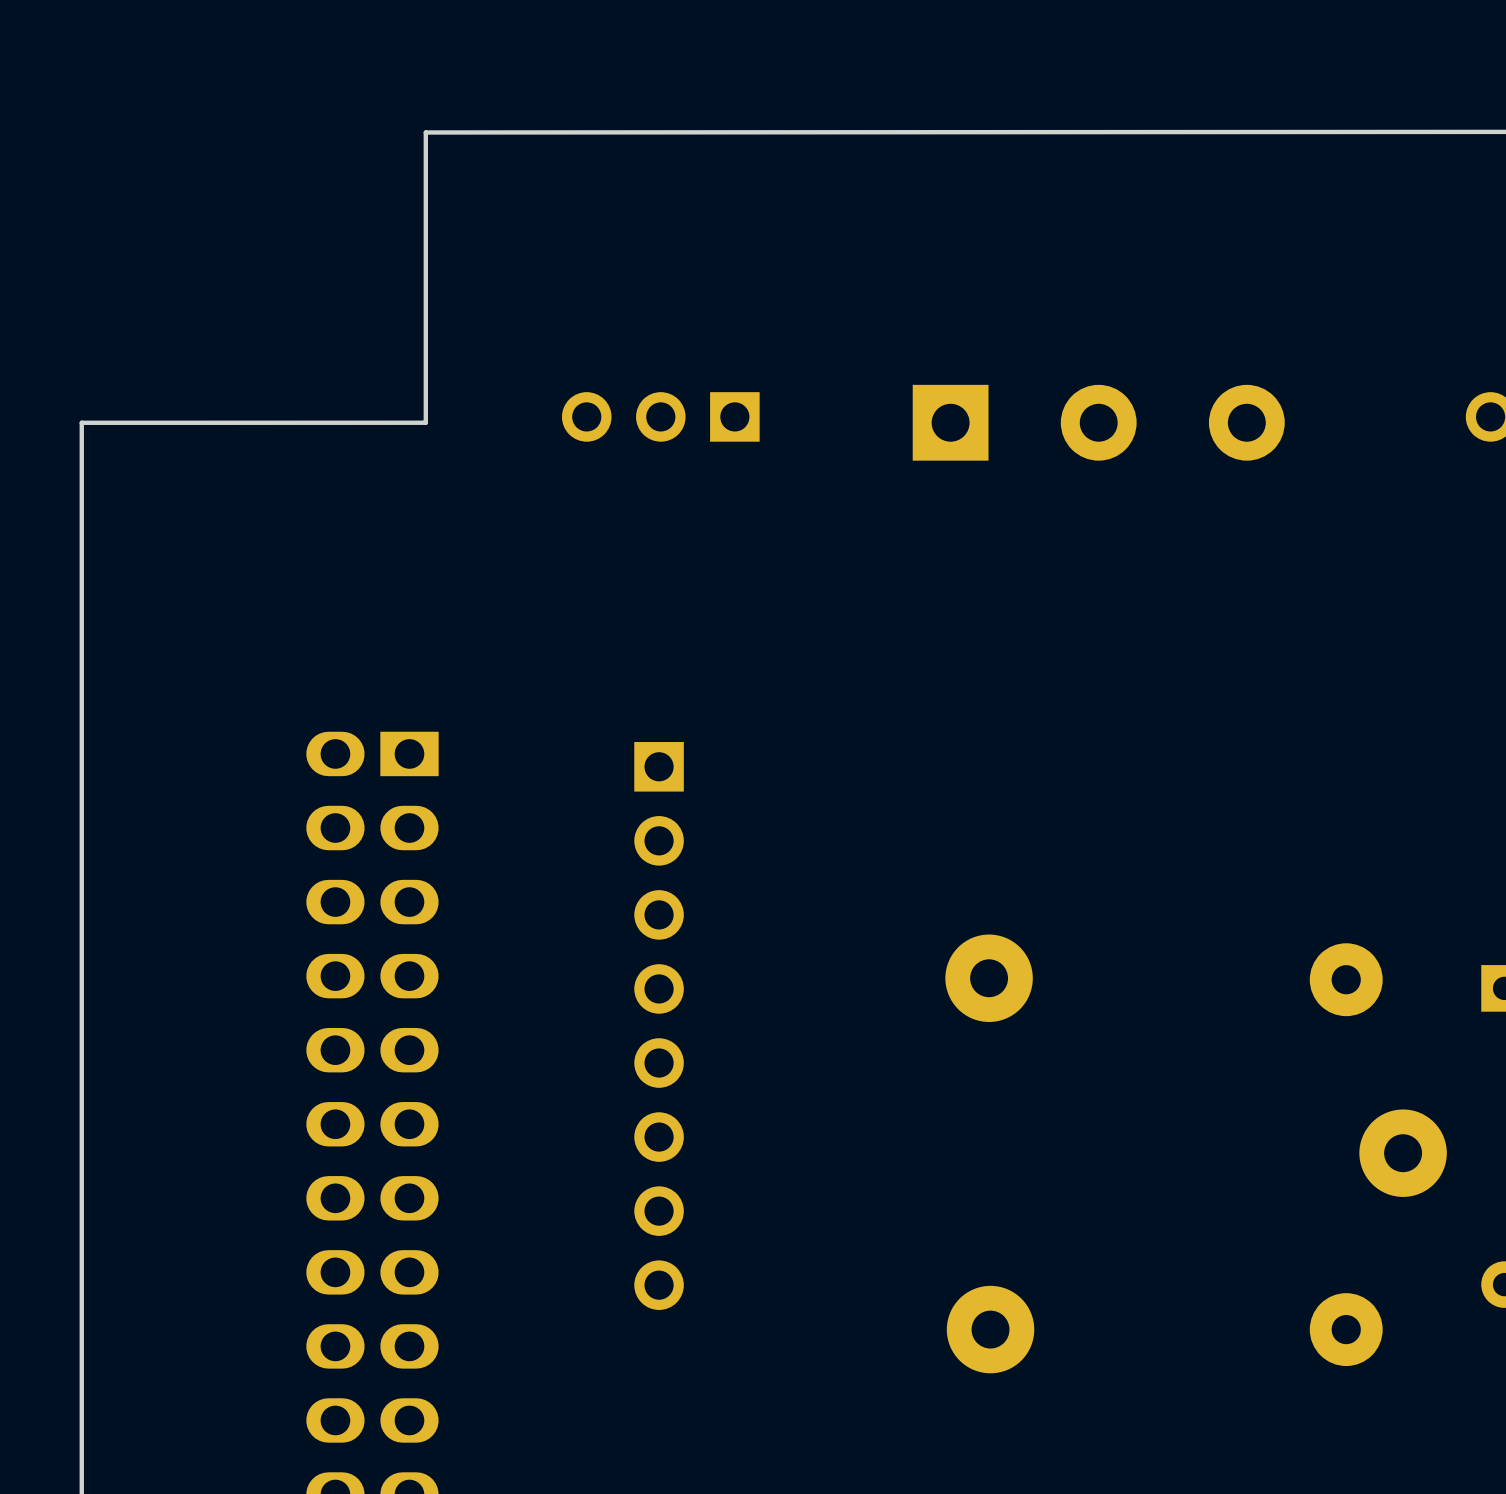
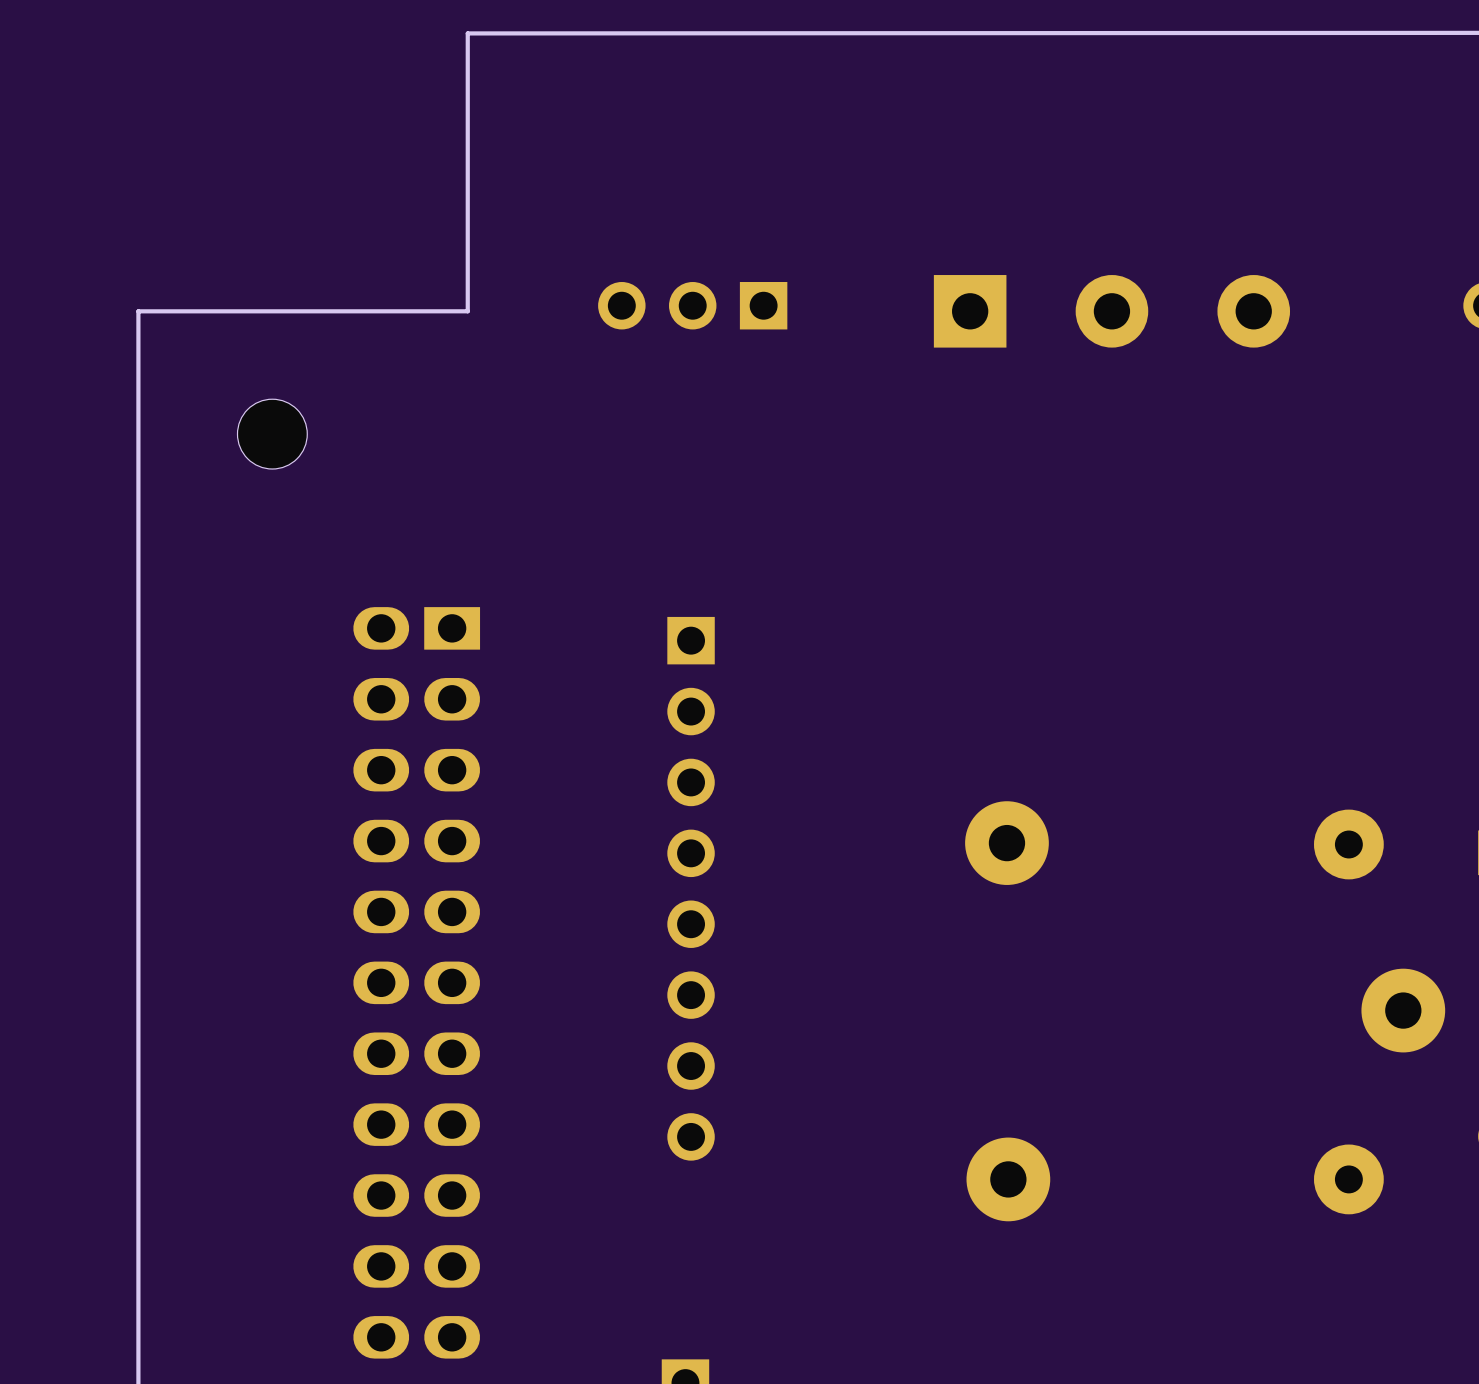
part: none -> (272, 434)

